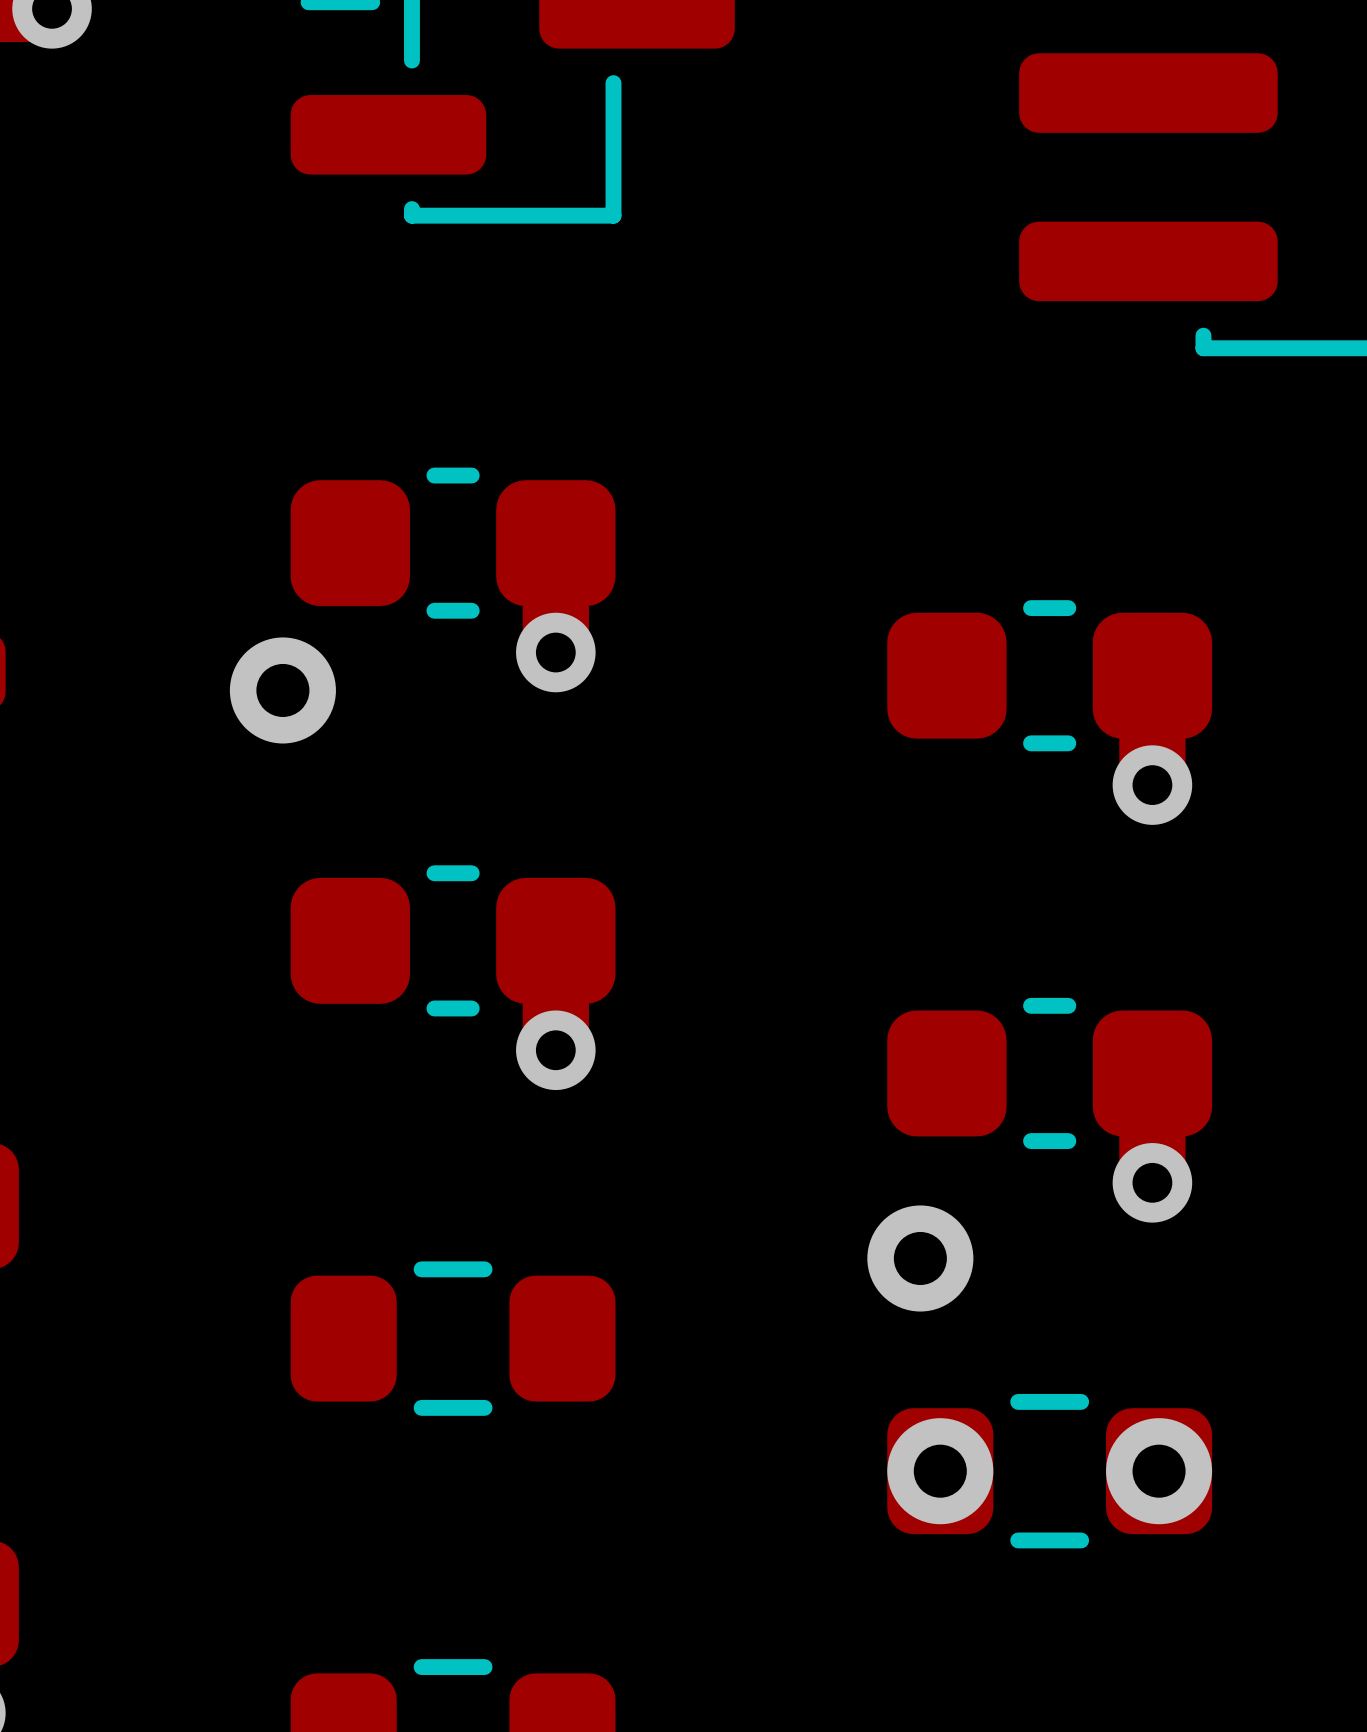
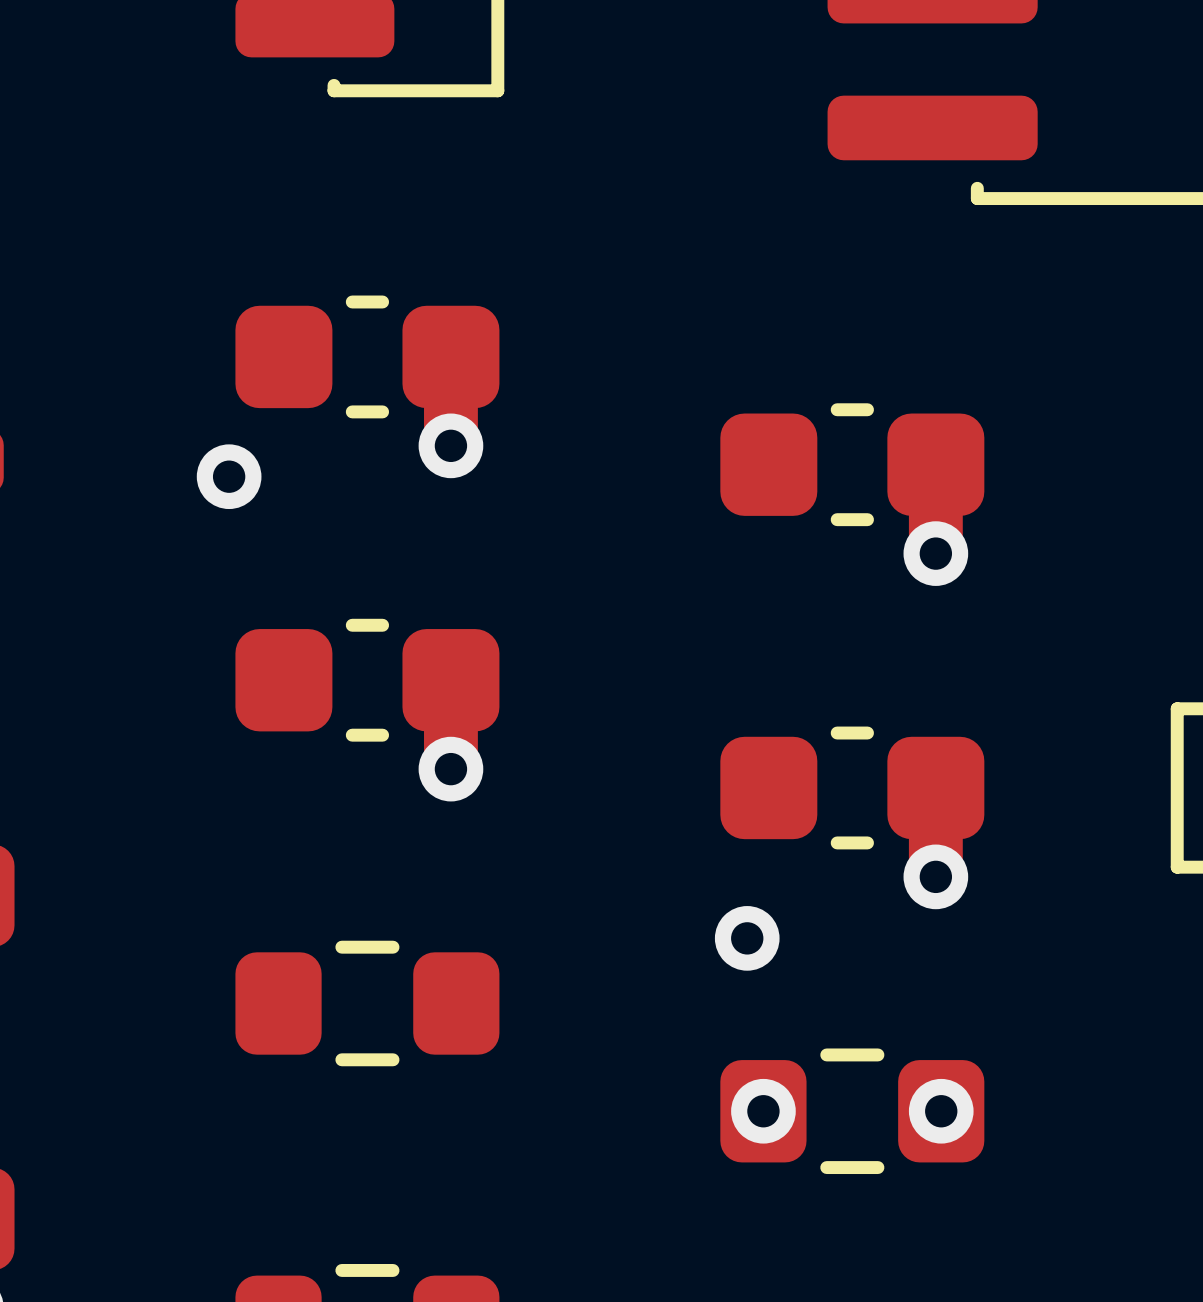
via size: [229, 637, 336, 744] -> [196, 444, 262, 510]
via size: [867, 1205, 974, 1312] -> [714, 906, 780, 971]
via size: [887, 1418, 994, 1525] -> [731, 1078, 796, 1144]
via size: [1106, 1418, 1213, 1525] -> [908, 1078, 974, 1144]

